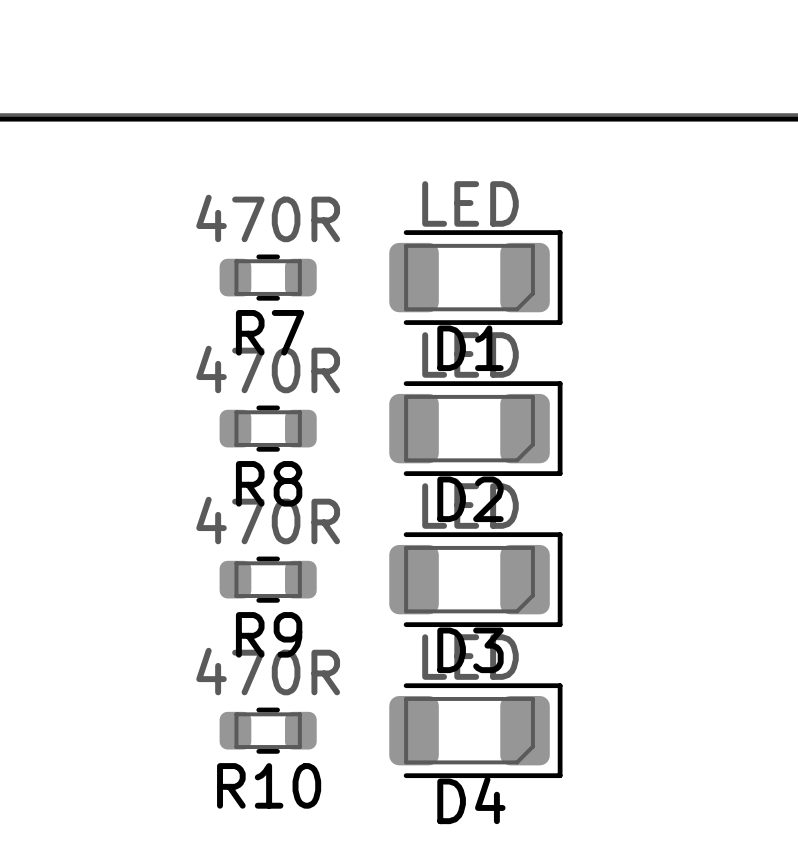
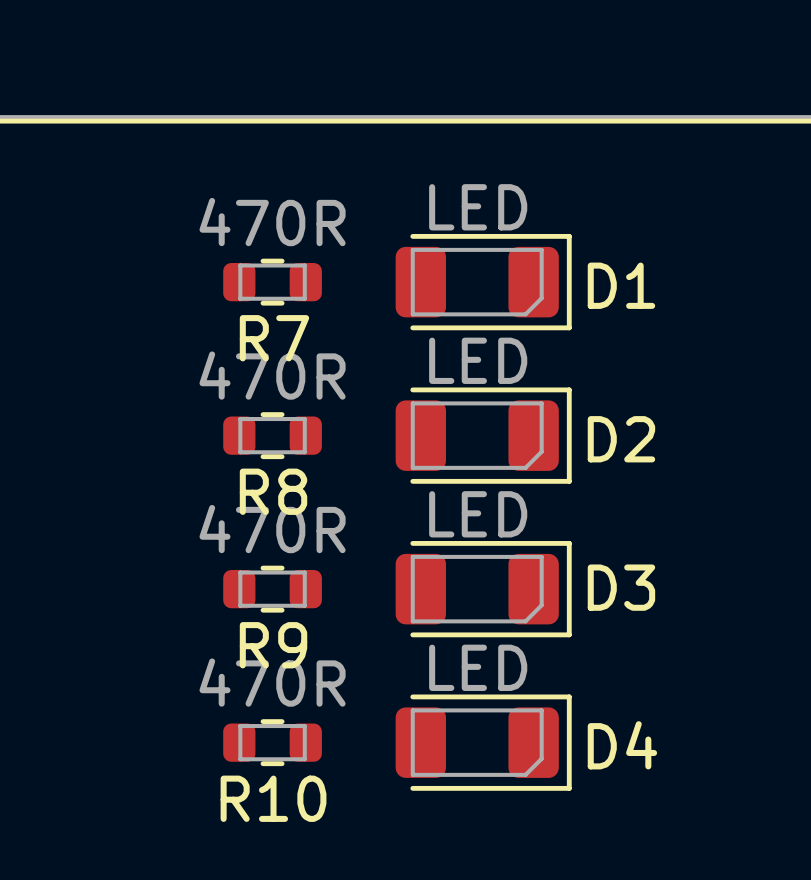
D1 name position: D1 (470, 348) -> D1 (621, 285)
D2 name position: D2 (470, 499) -> D2 (621, 439)
D3 name position: D3 (470, 650) -> D3 (621, 587)
D4 name position: D4 (471, 800) -> D4 (622, 745)

